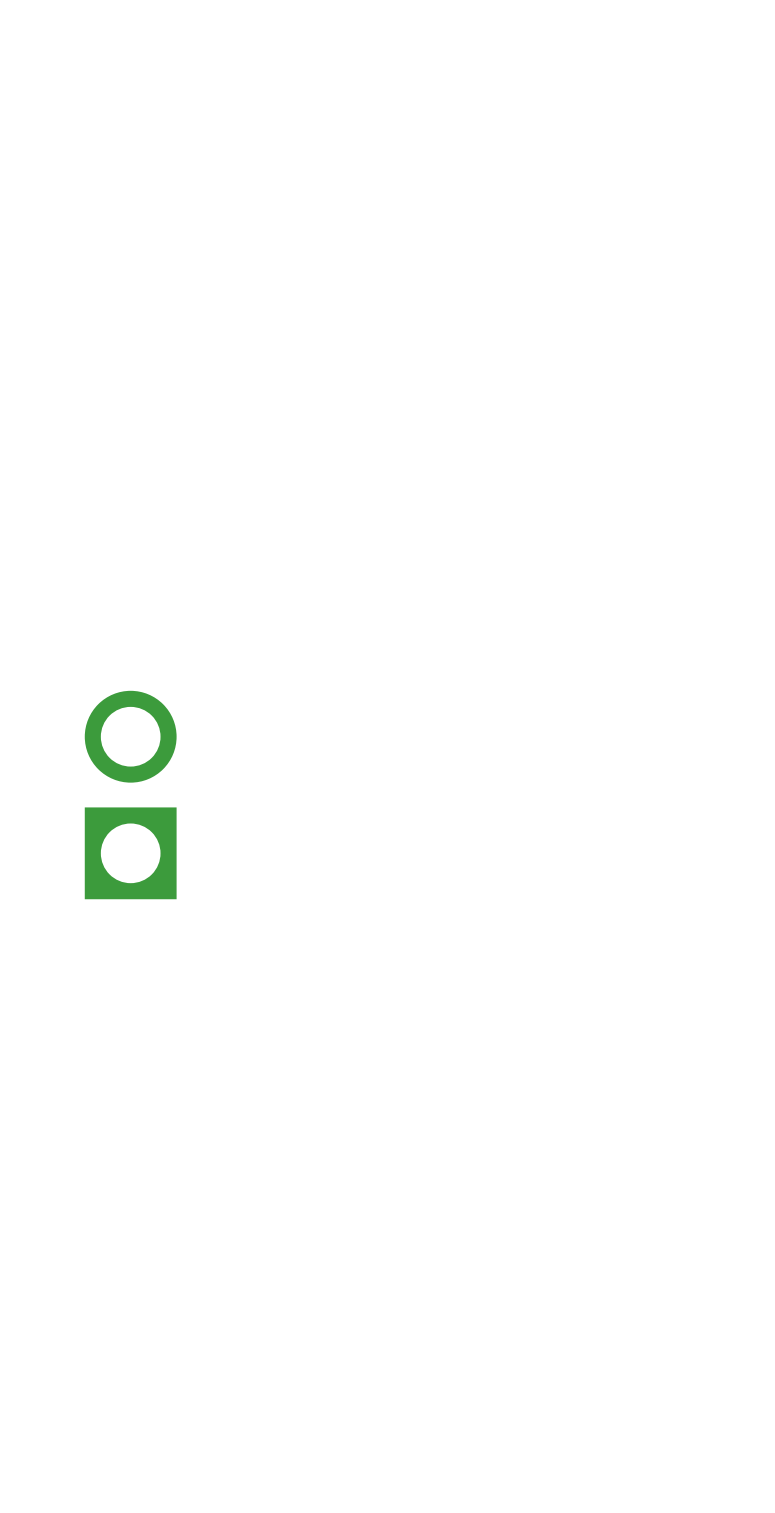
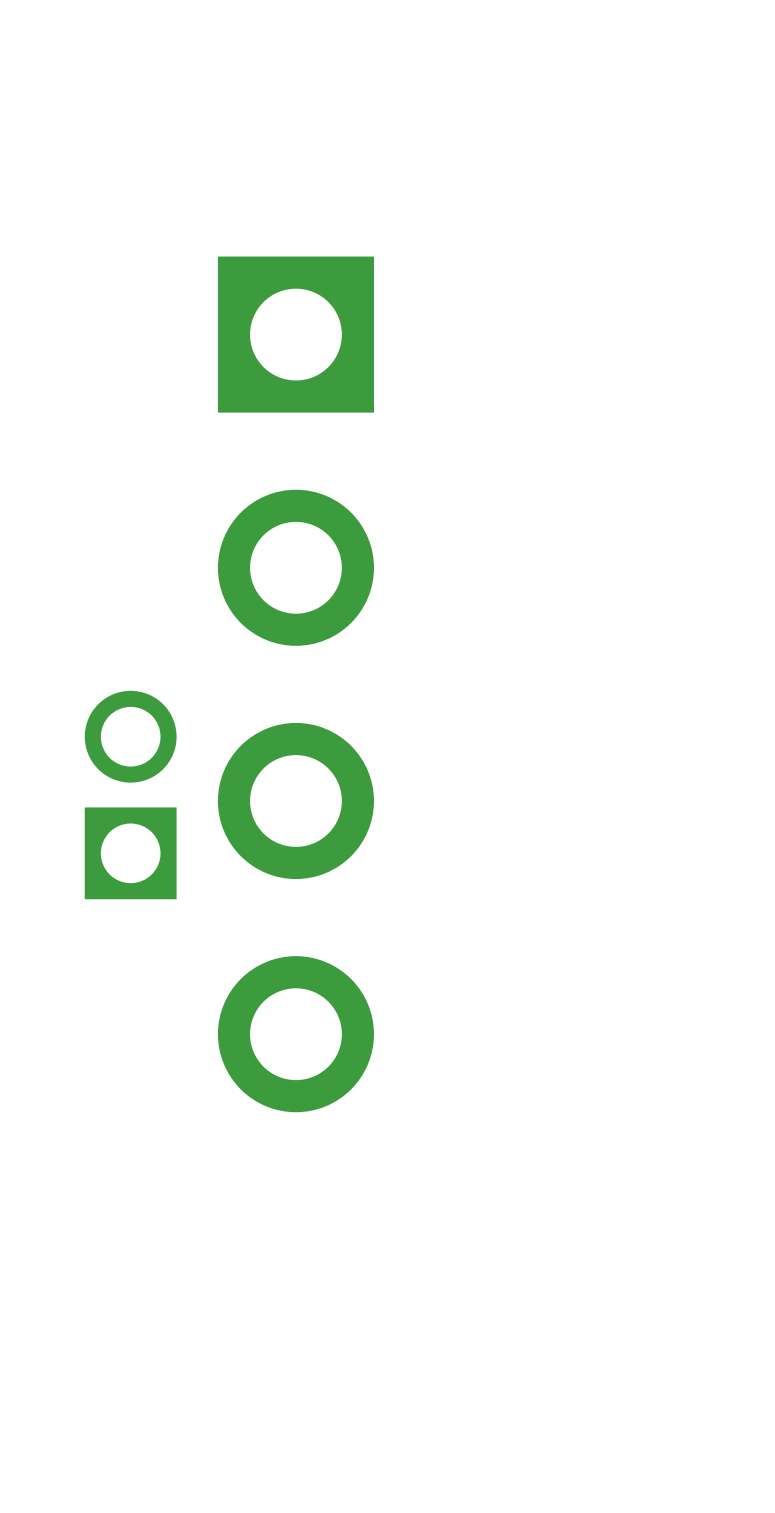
part: none -> (295, 684)

